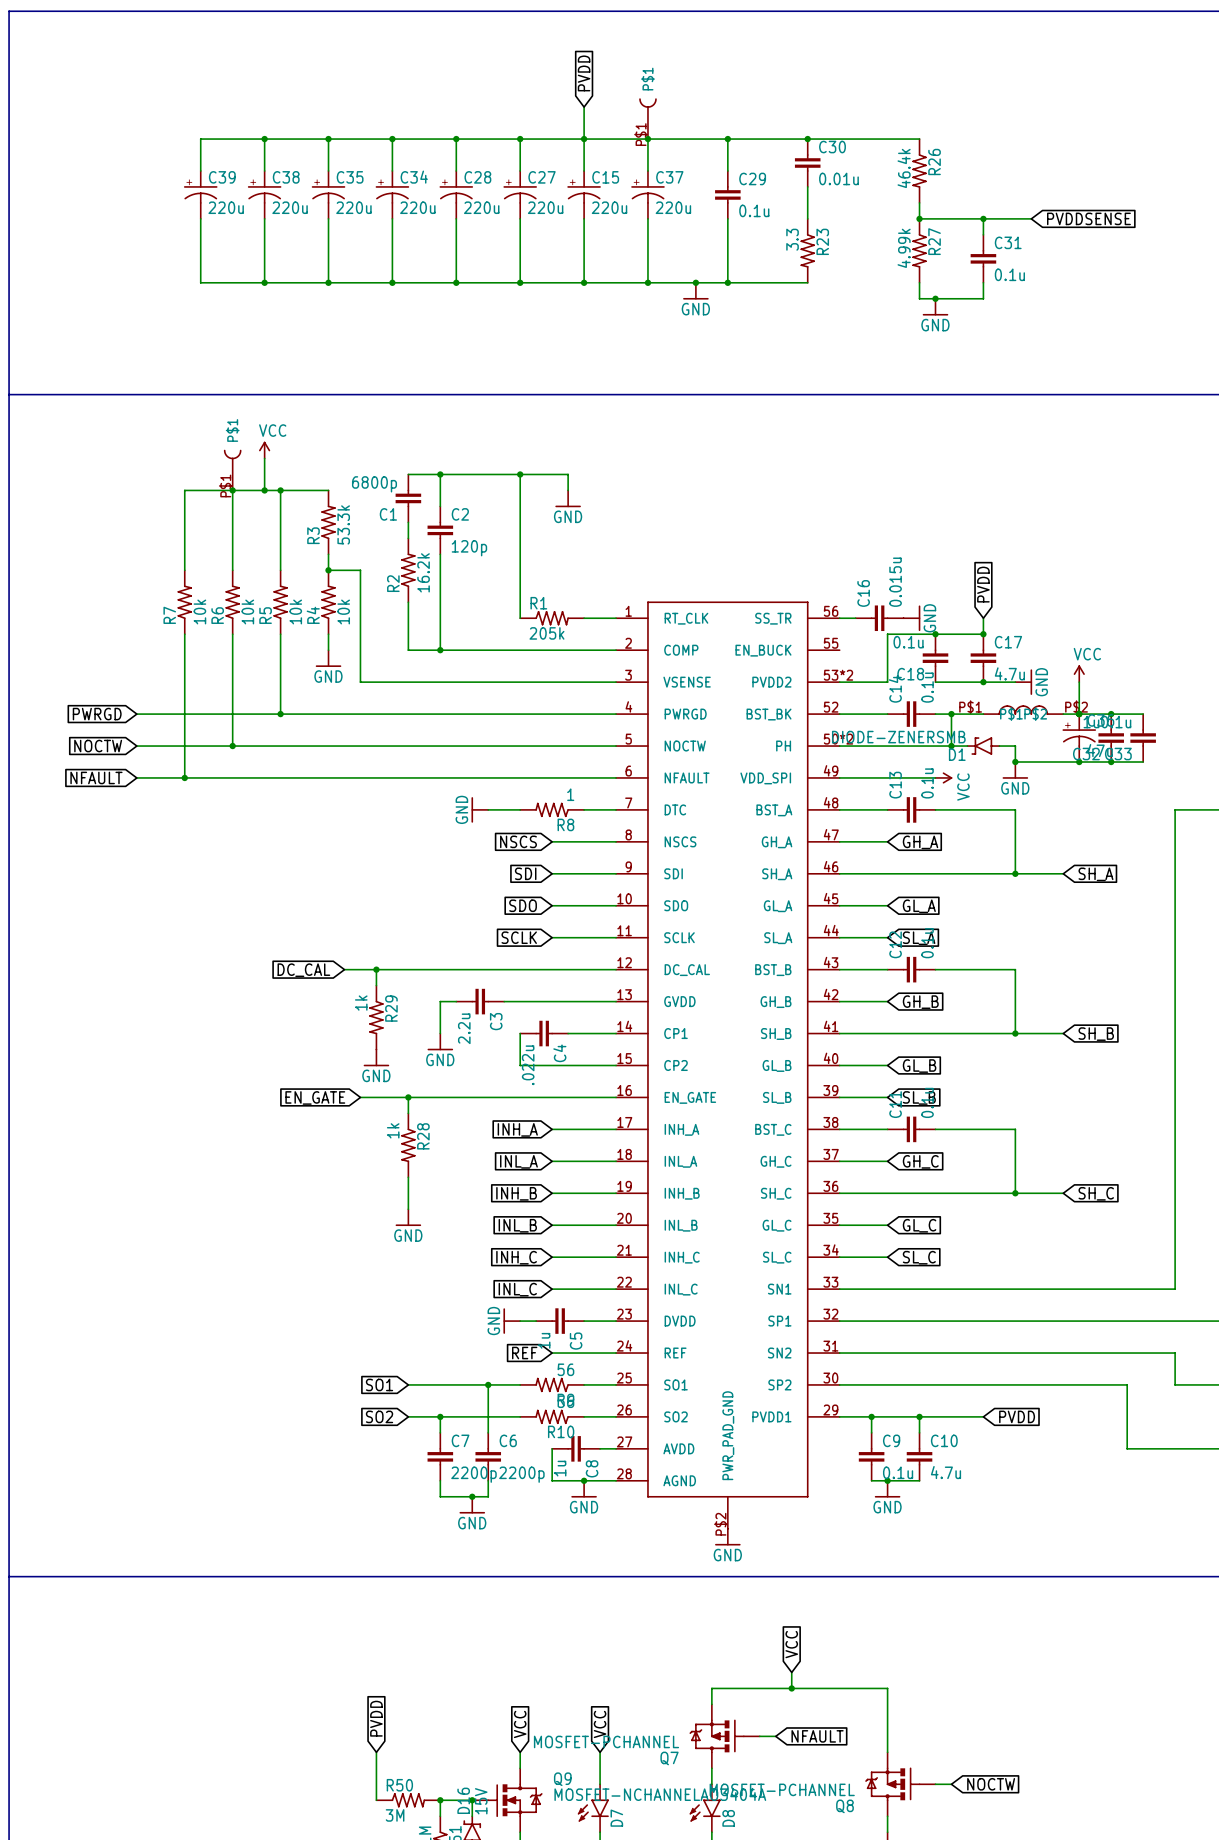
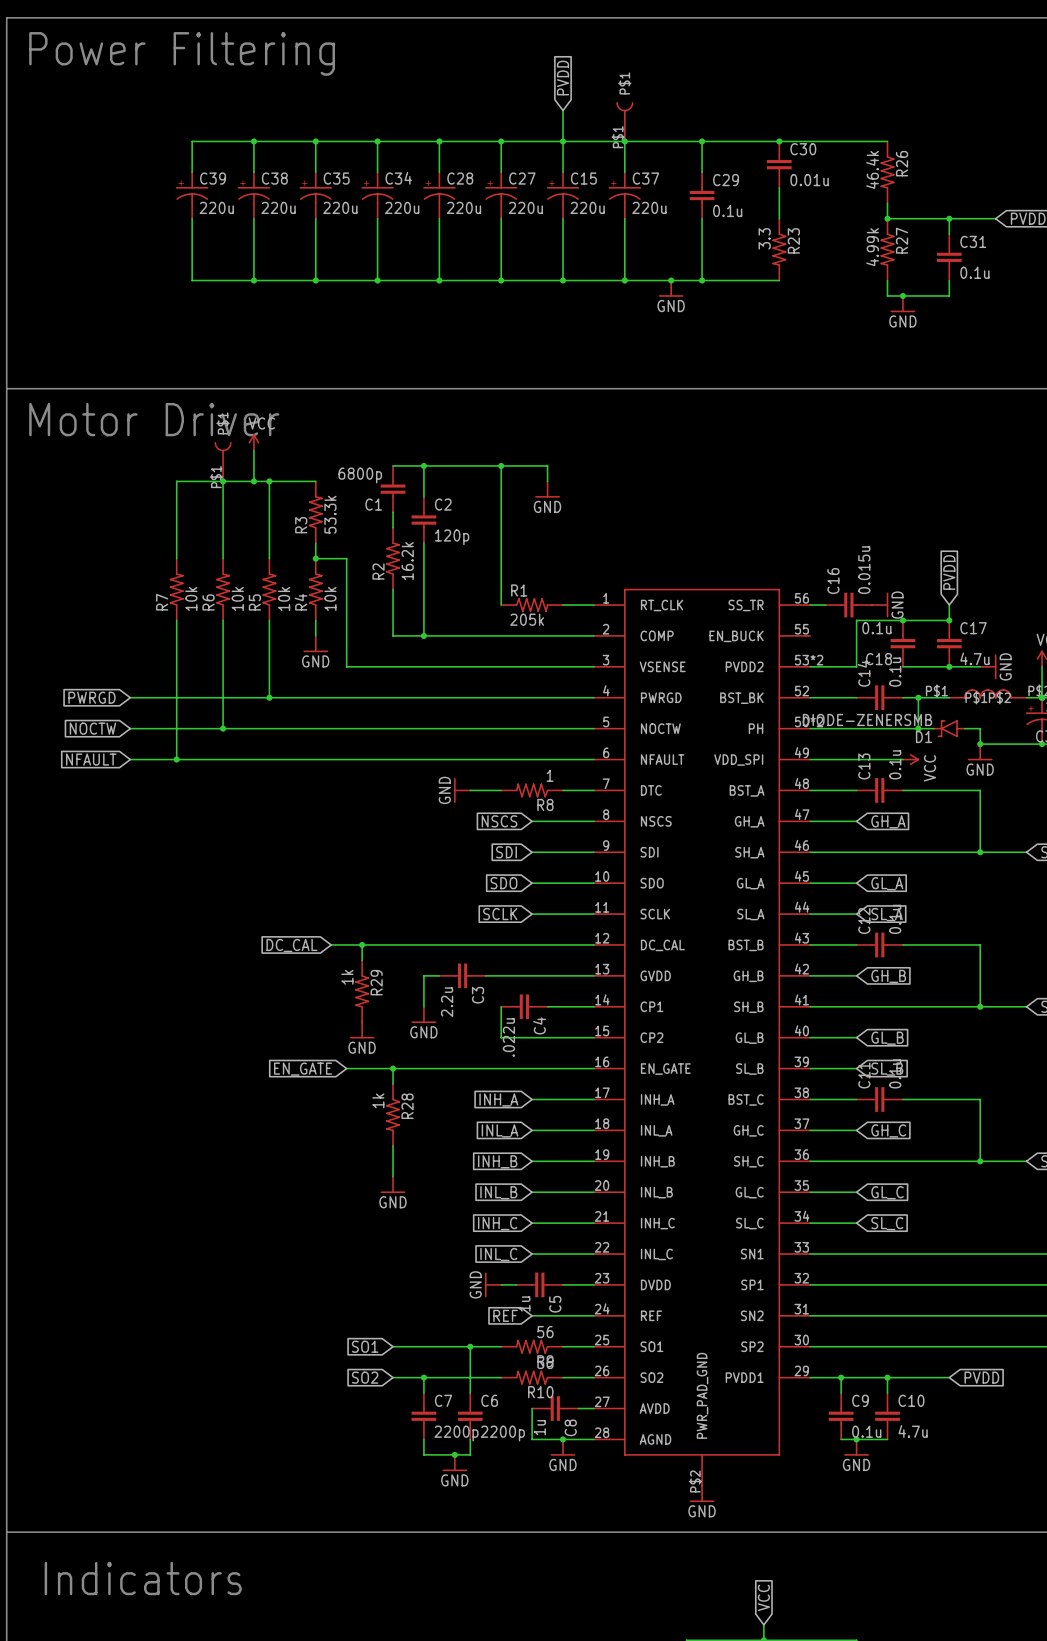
text: none -> Power Filtering (182, 53)
text: none -> Motor Driver (154, 419)
text: none -> Indicators (143, 1578)

